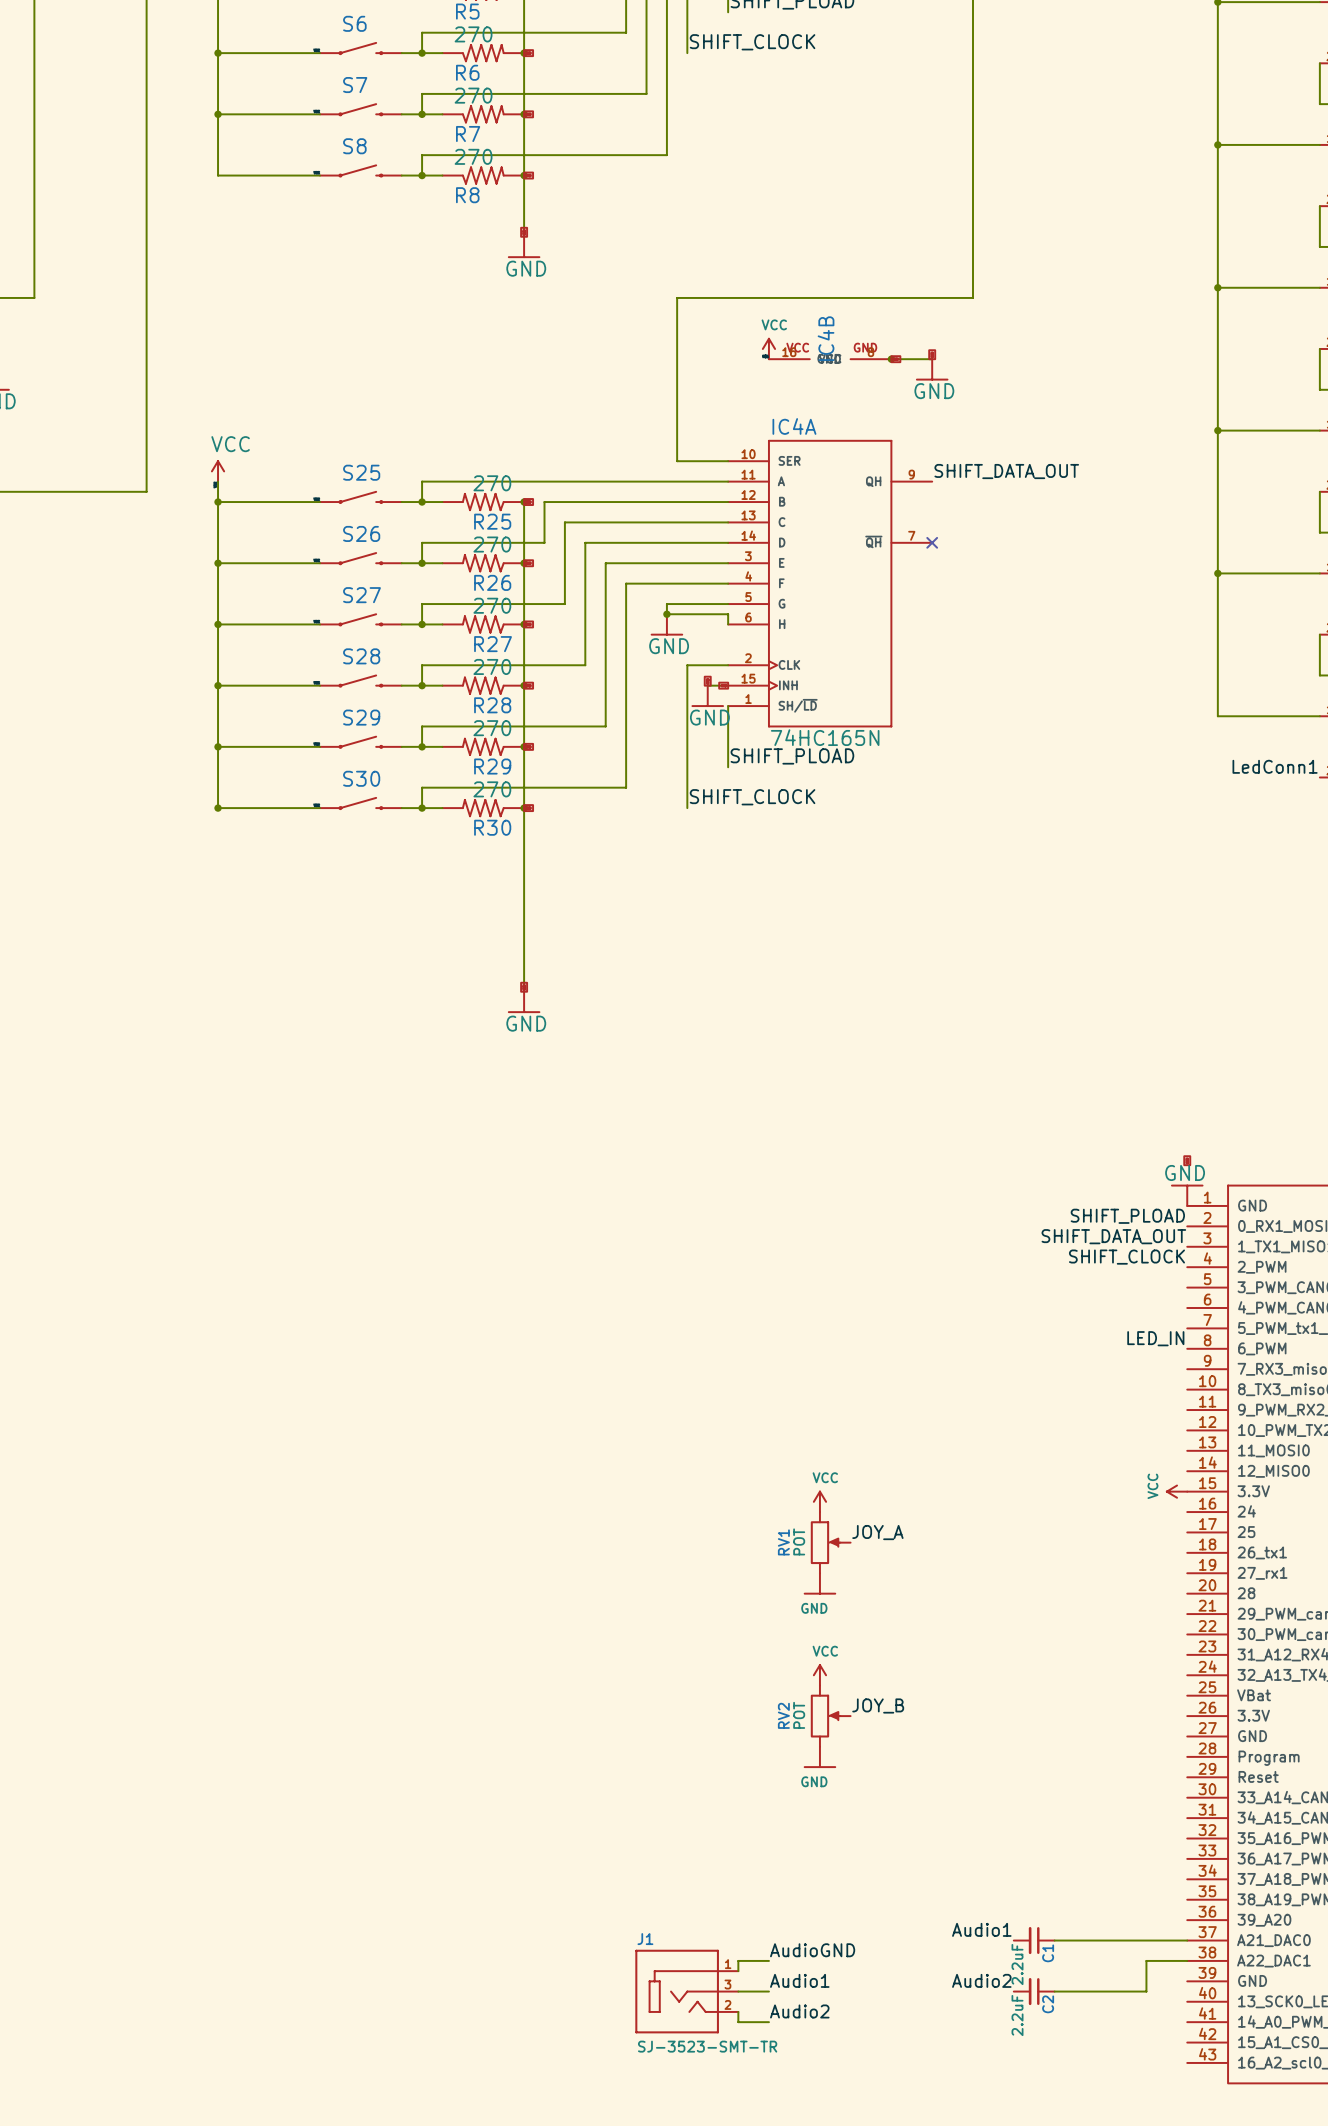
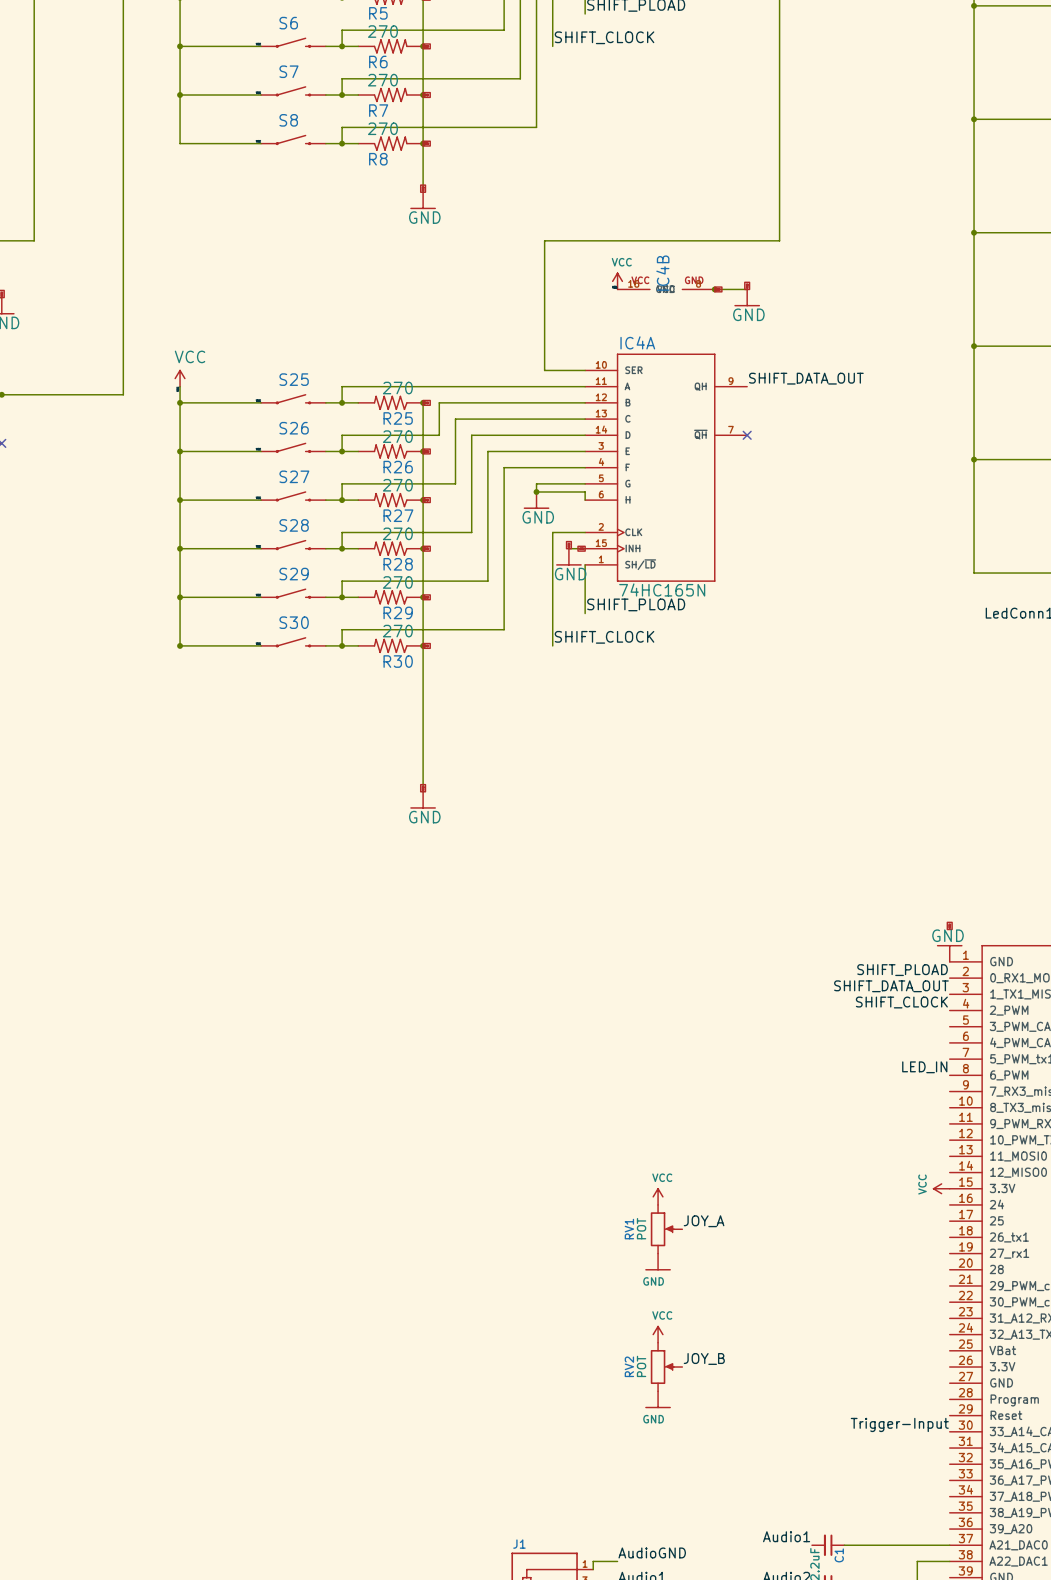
label: none -> Trigger-Input (899, 1424)

